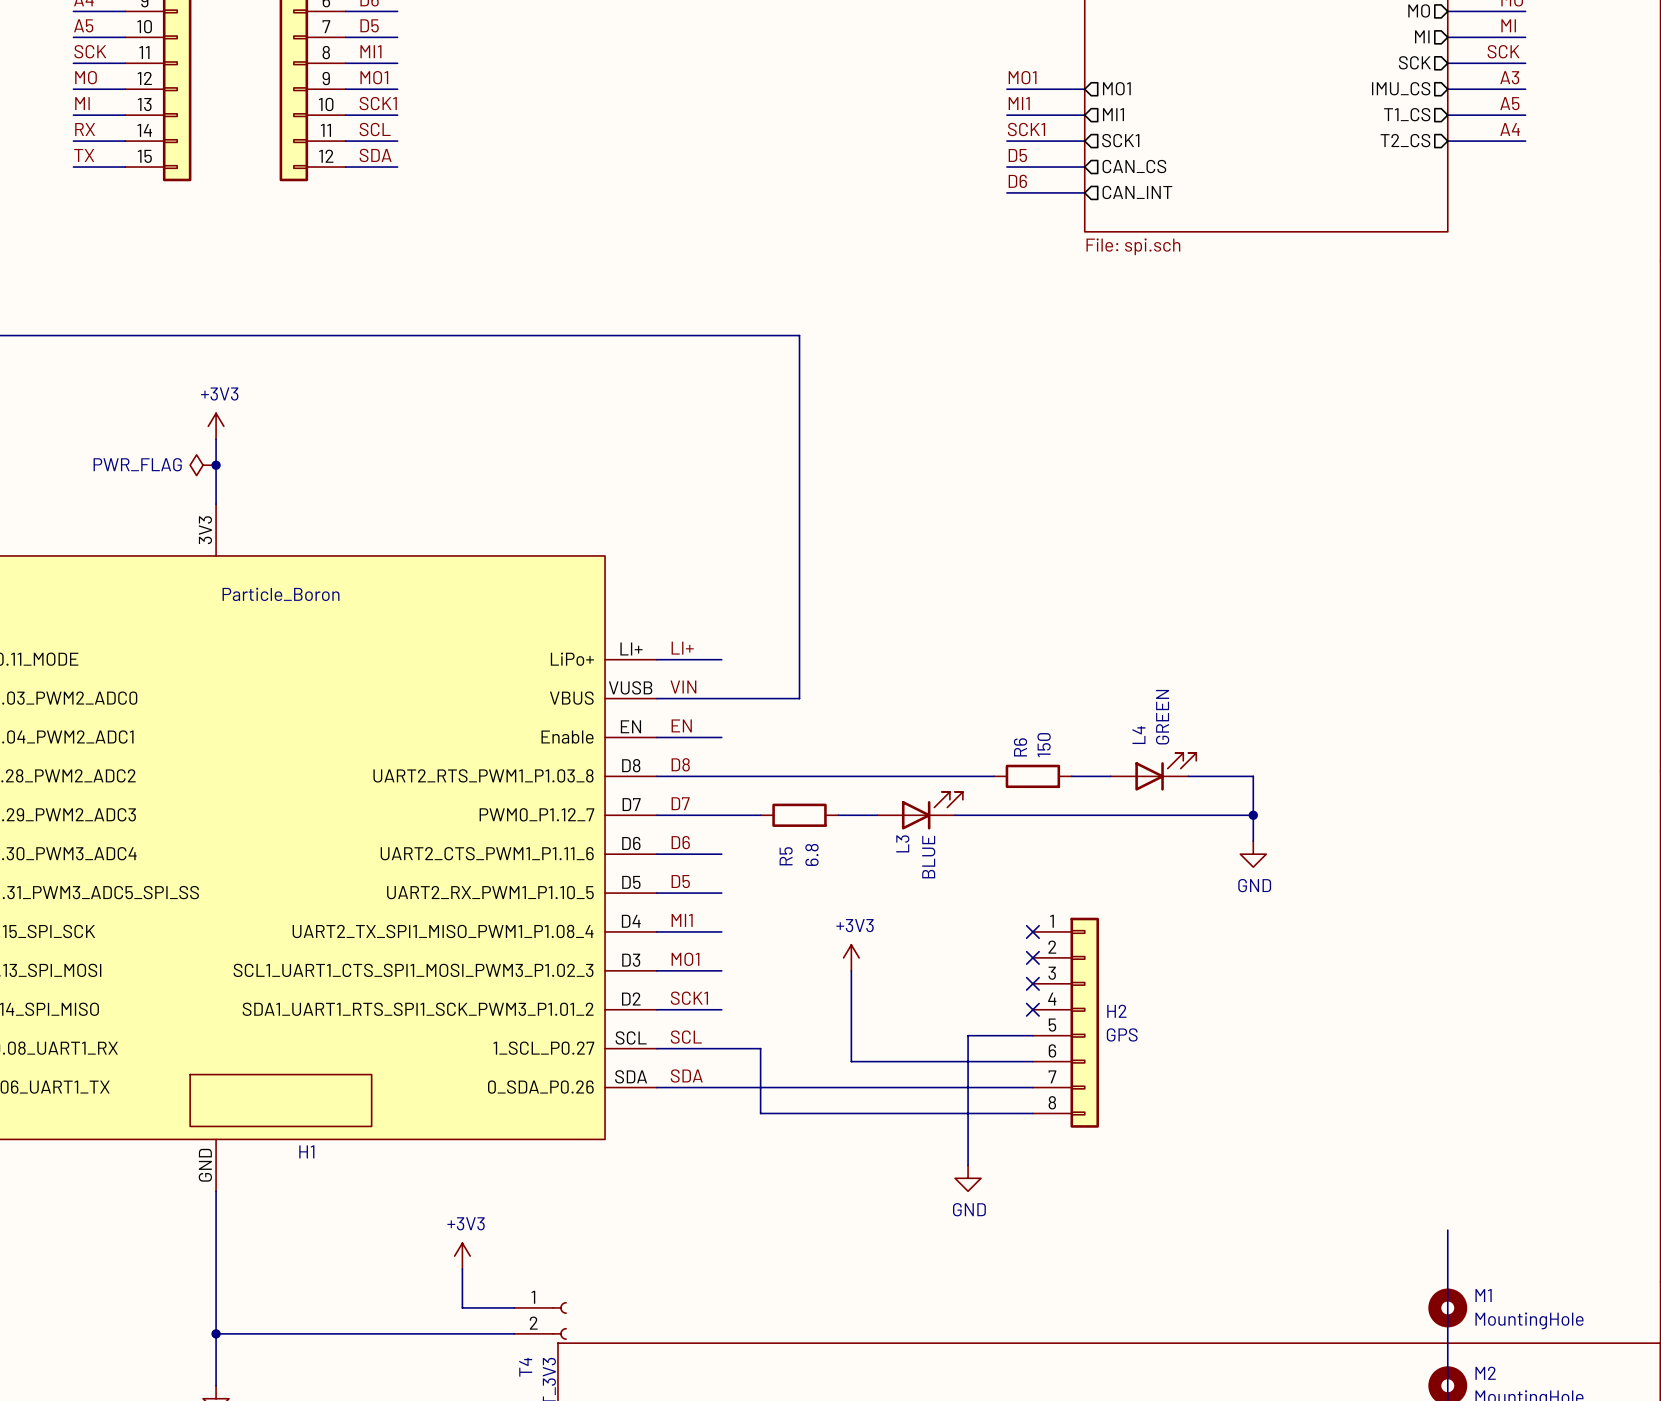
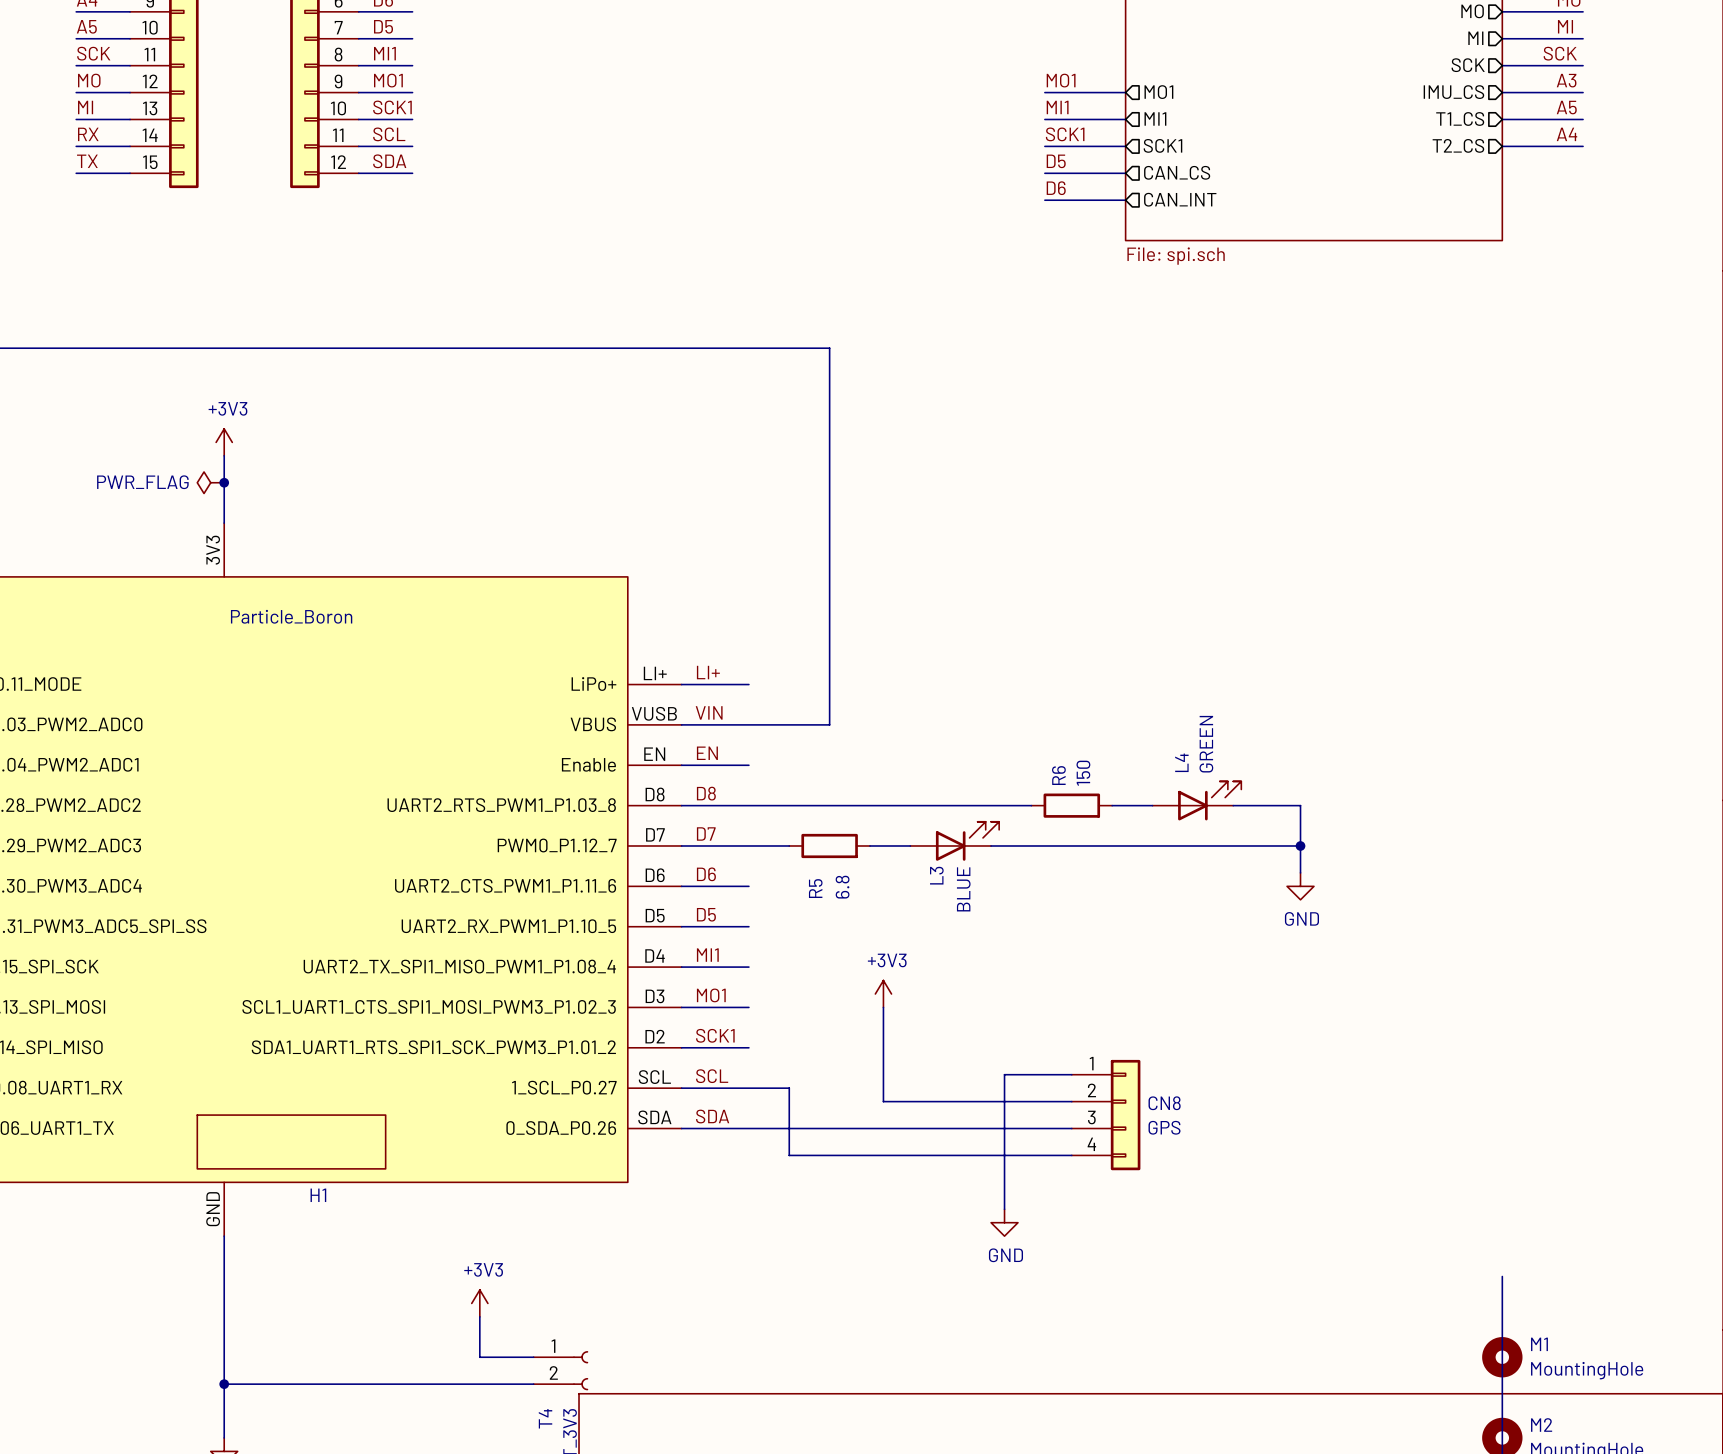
no-connect mark: (1032, 931) -> none
no-connect mark: (1032, 957) -> none
no-connect mark: (1032, 983) -> none
no-connect mark: (1032, 1009) -> none
H2: GPS (1065, 1022) -> none
CN8: none -> GPS (1106, 1115)

